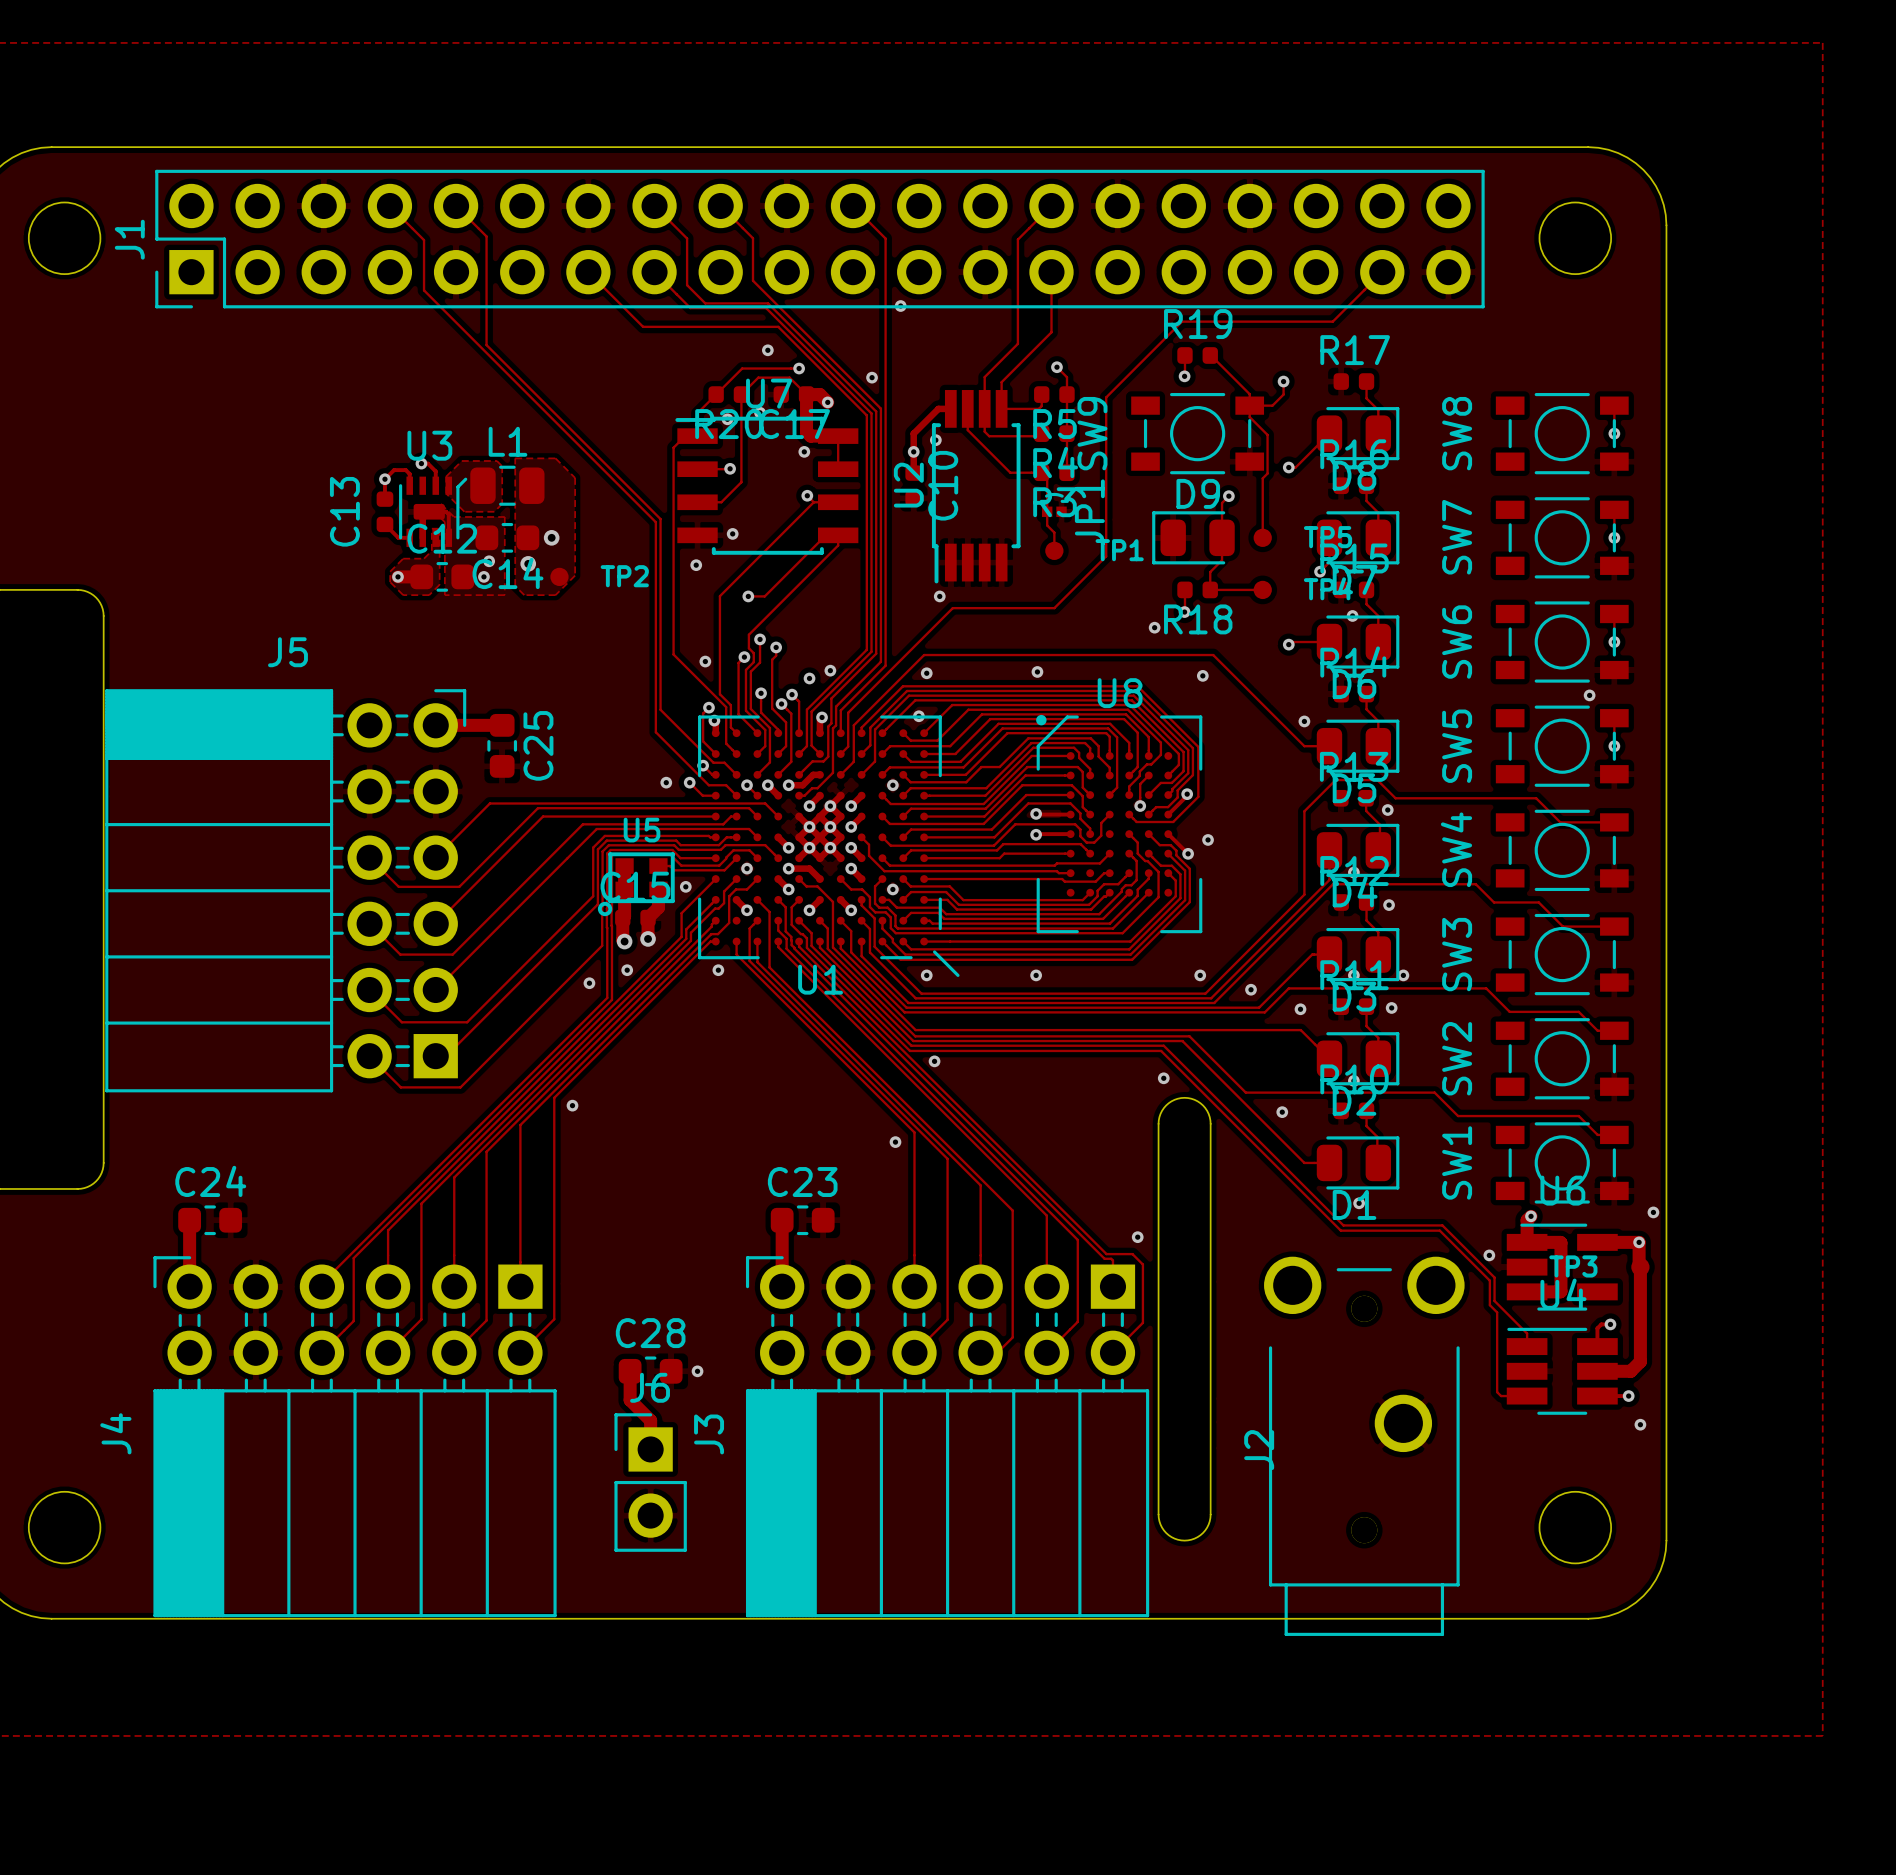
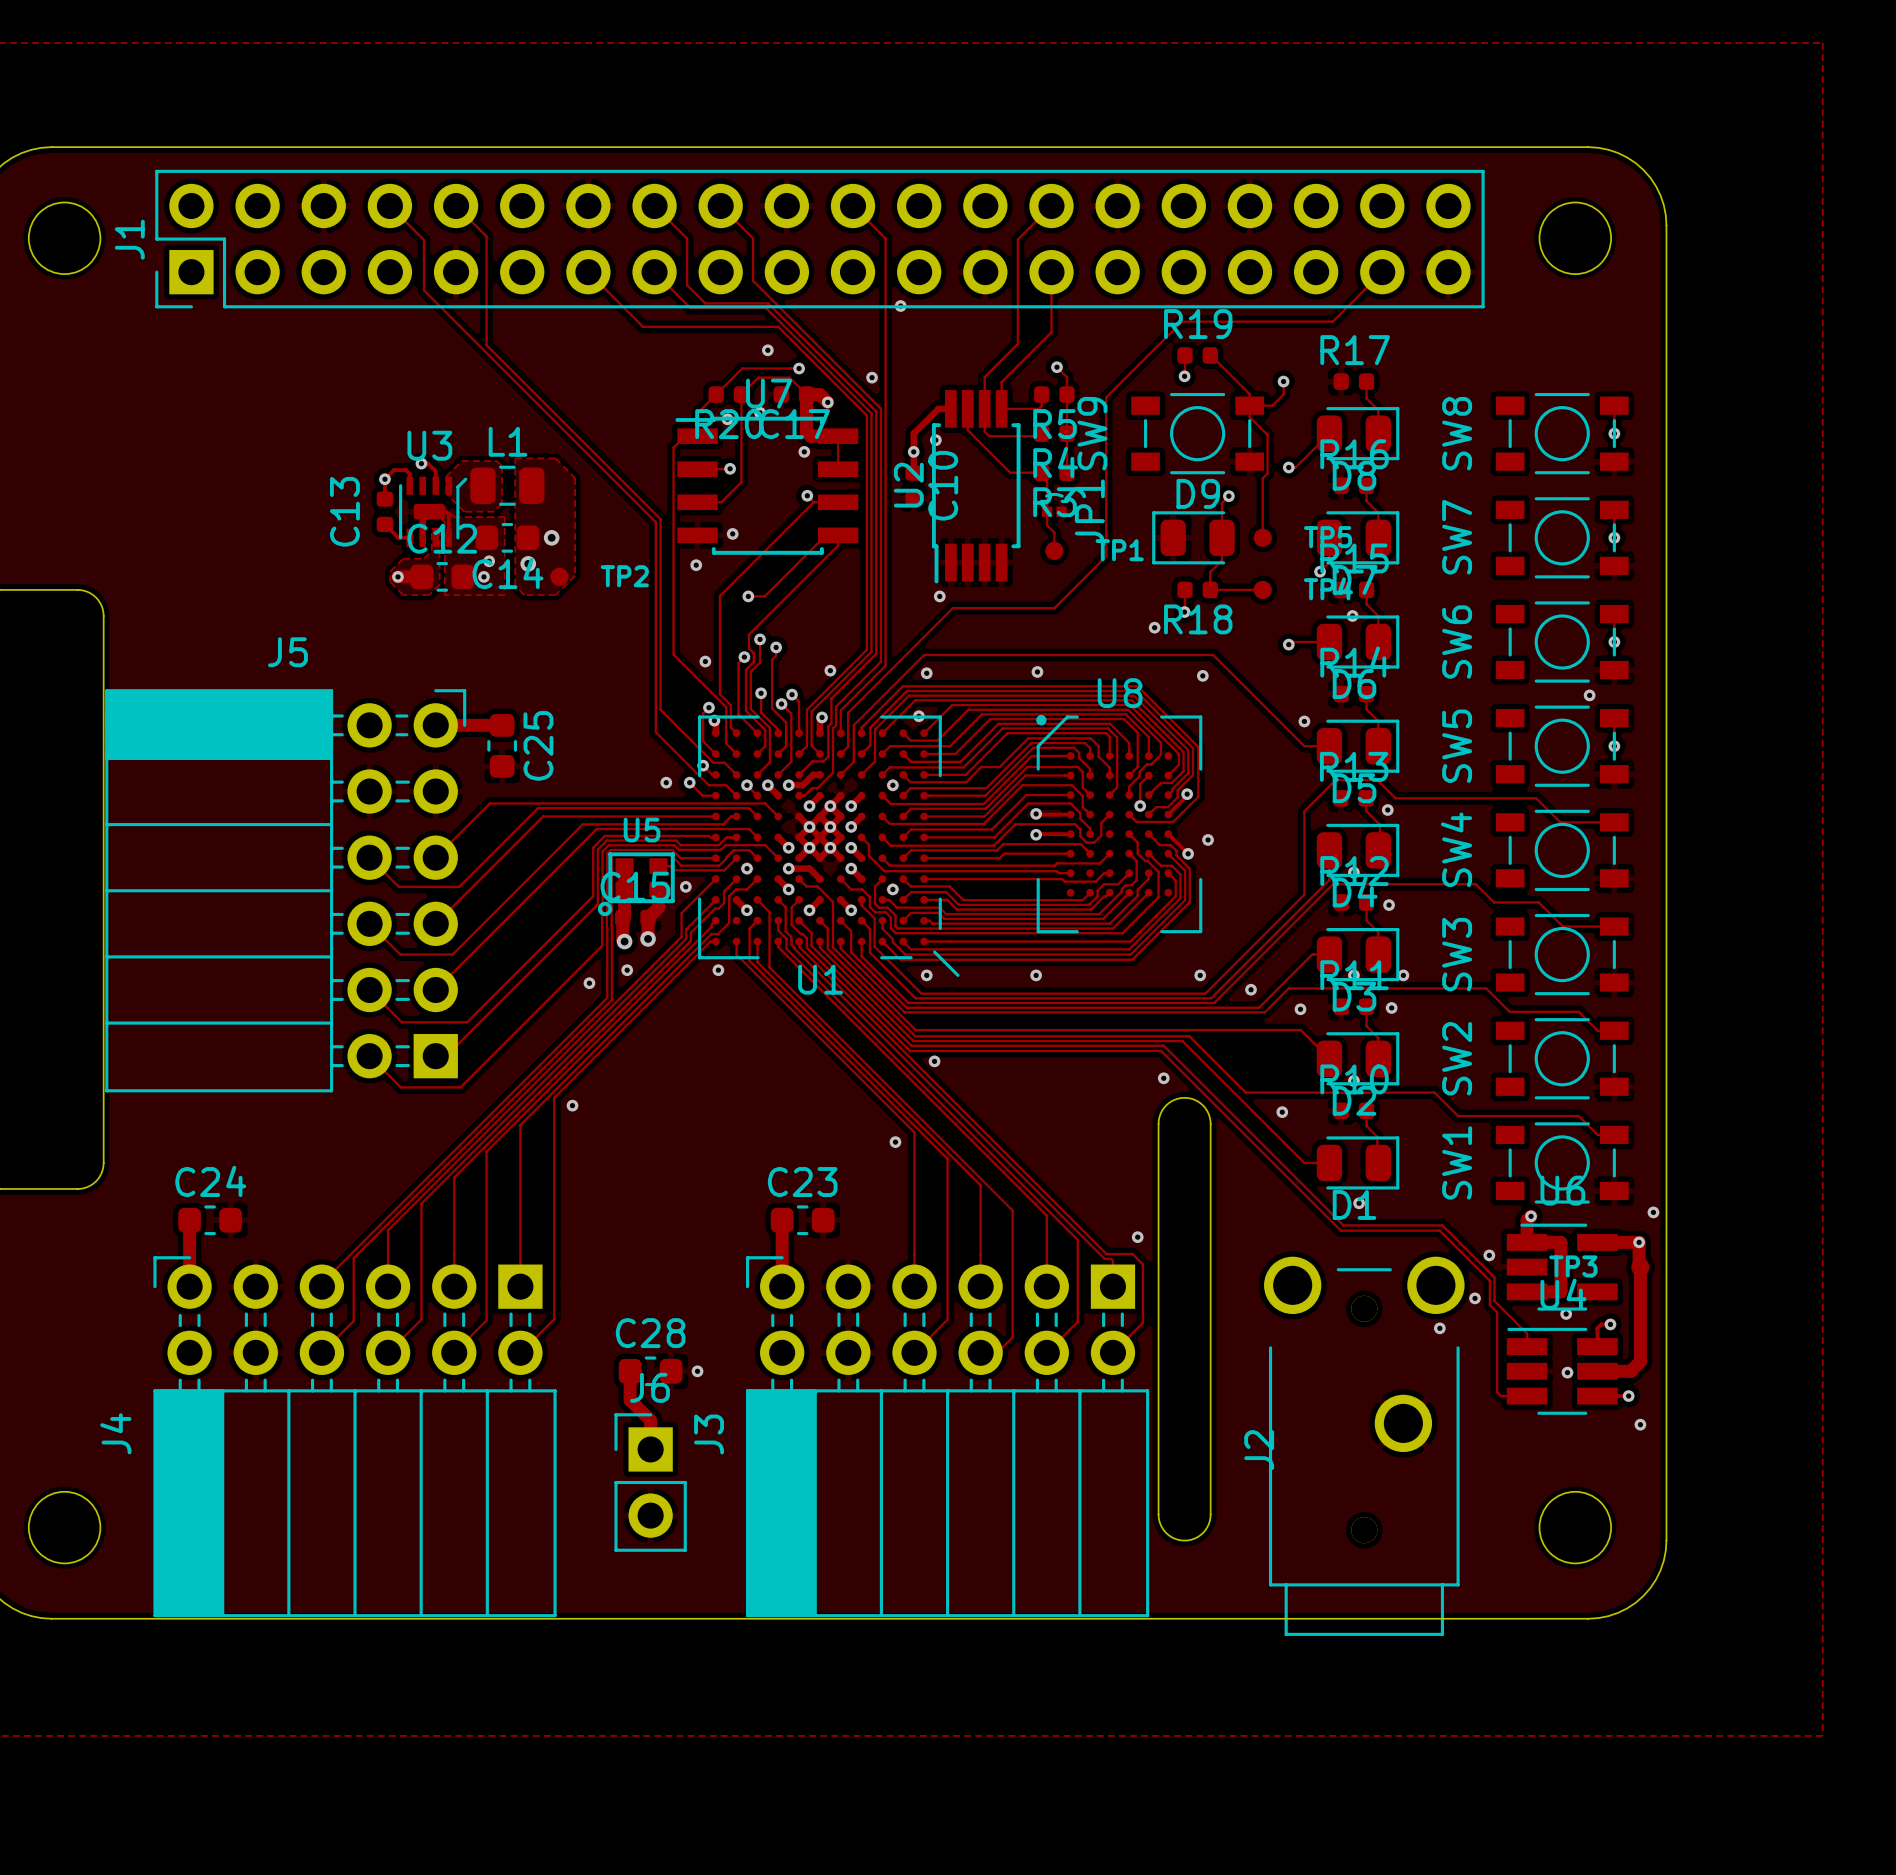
via: (809, 678) -> none
via: none -> (1475, 1298)
via: none -> (1566, 1314)
via: none -> (1439, 1328)
via: none -> (1567, 1372)

